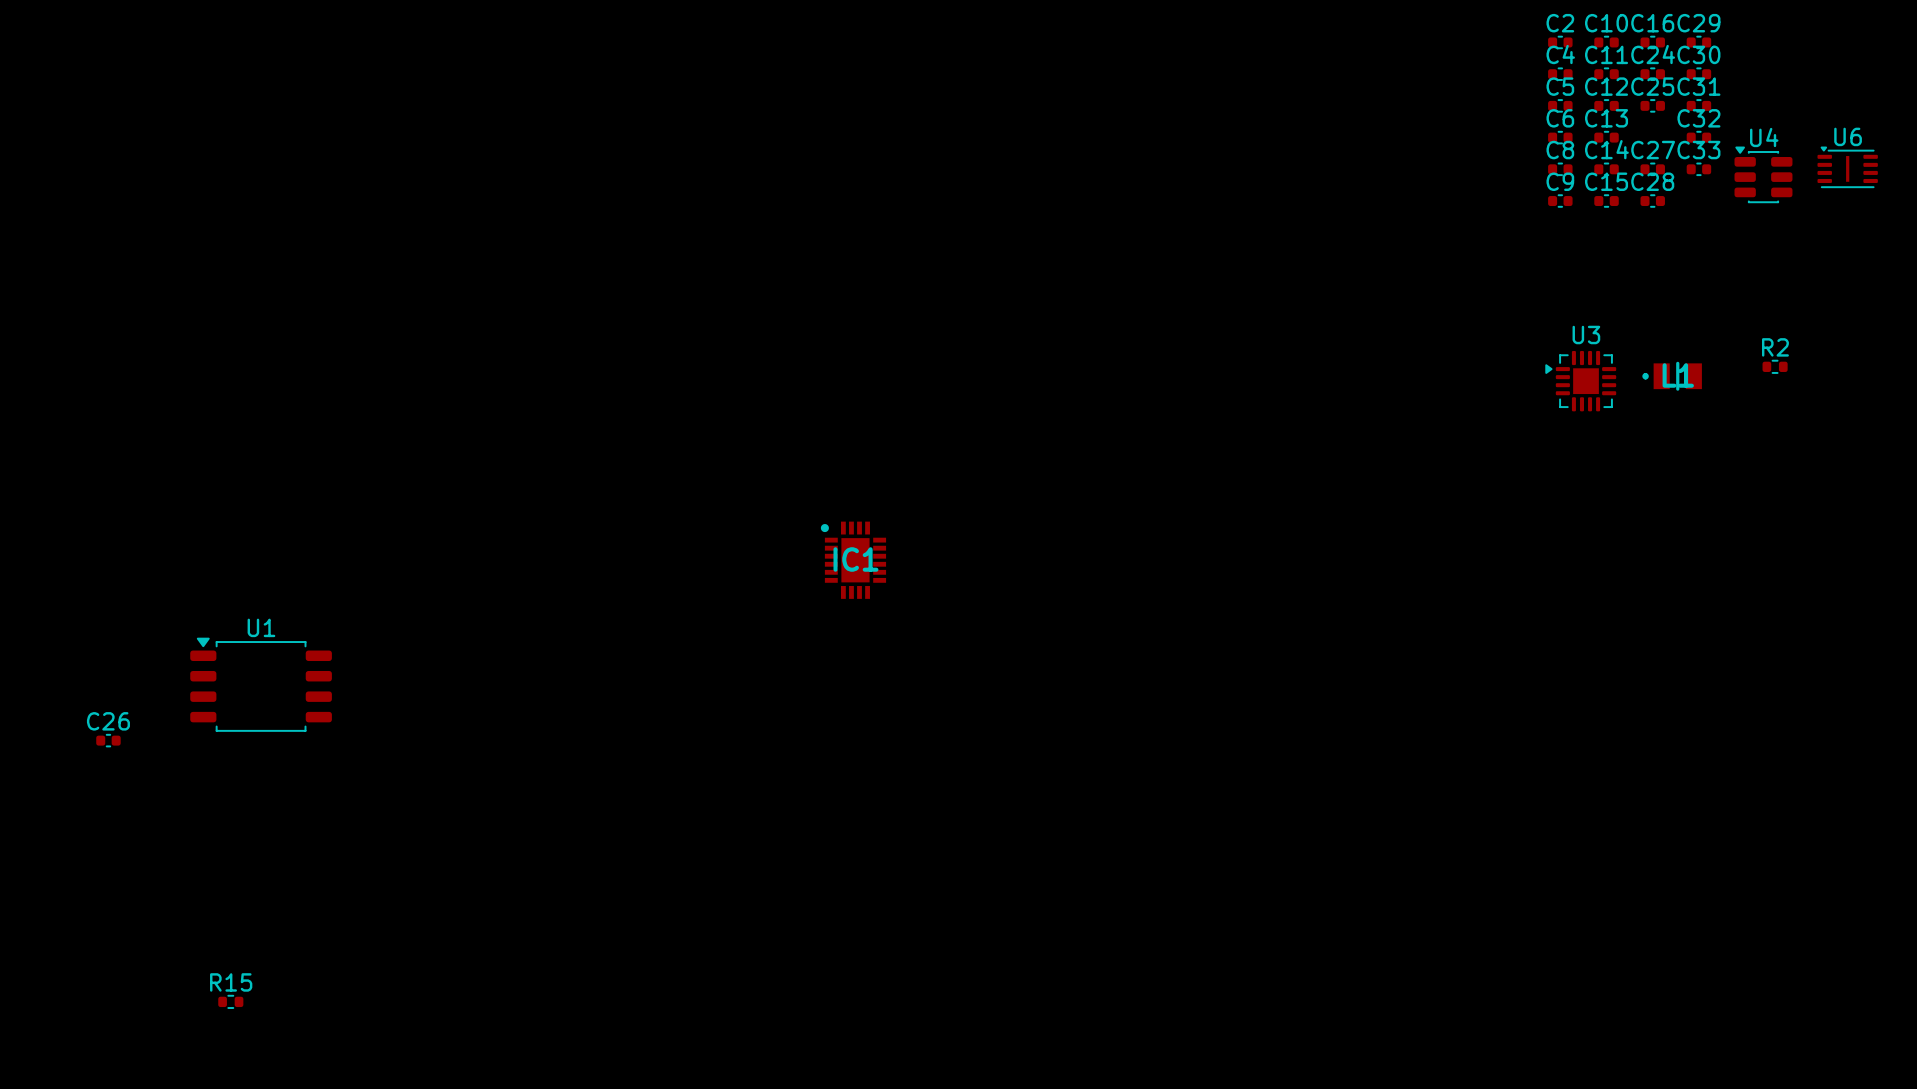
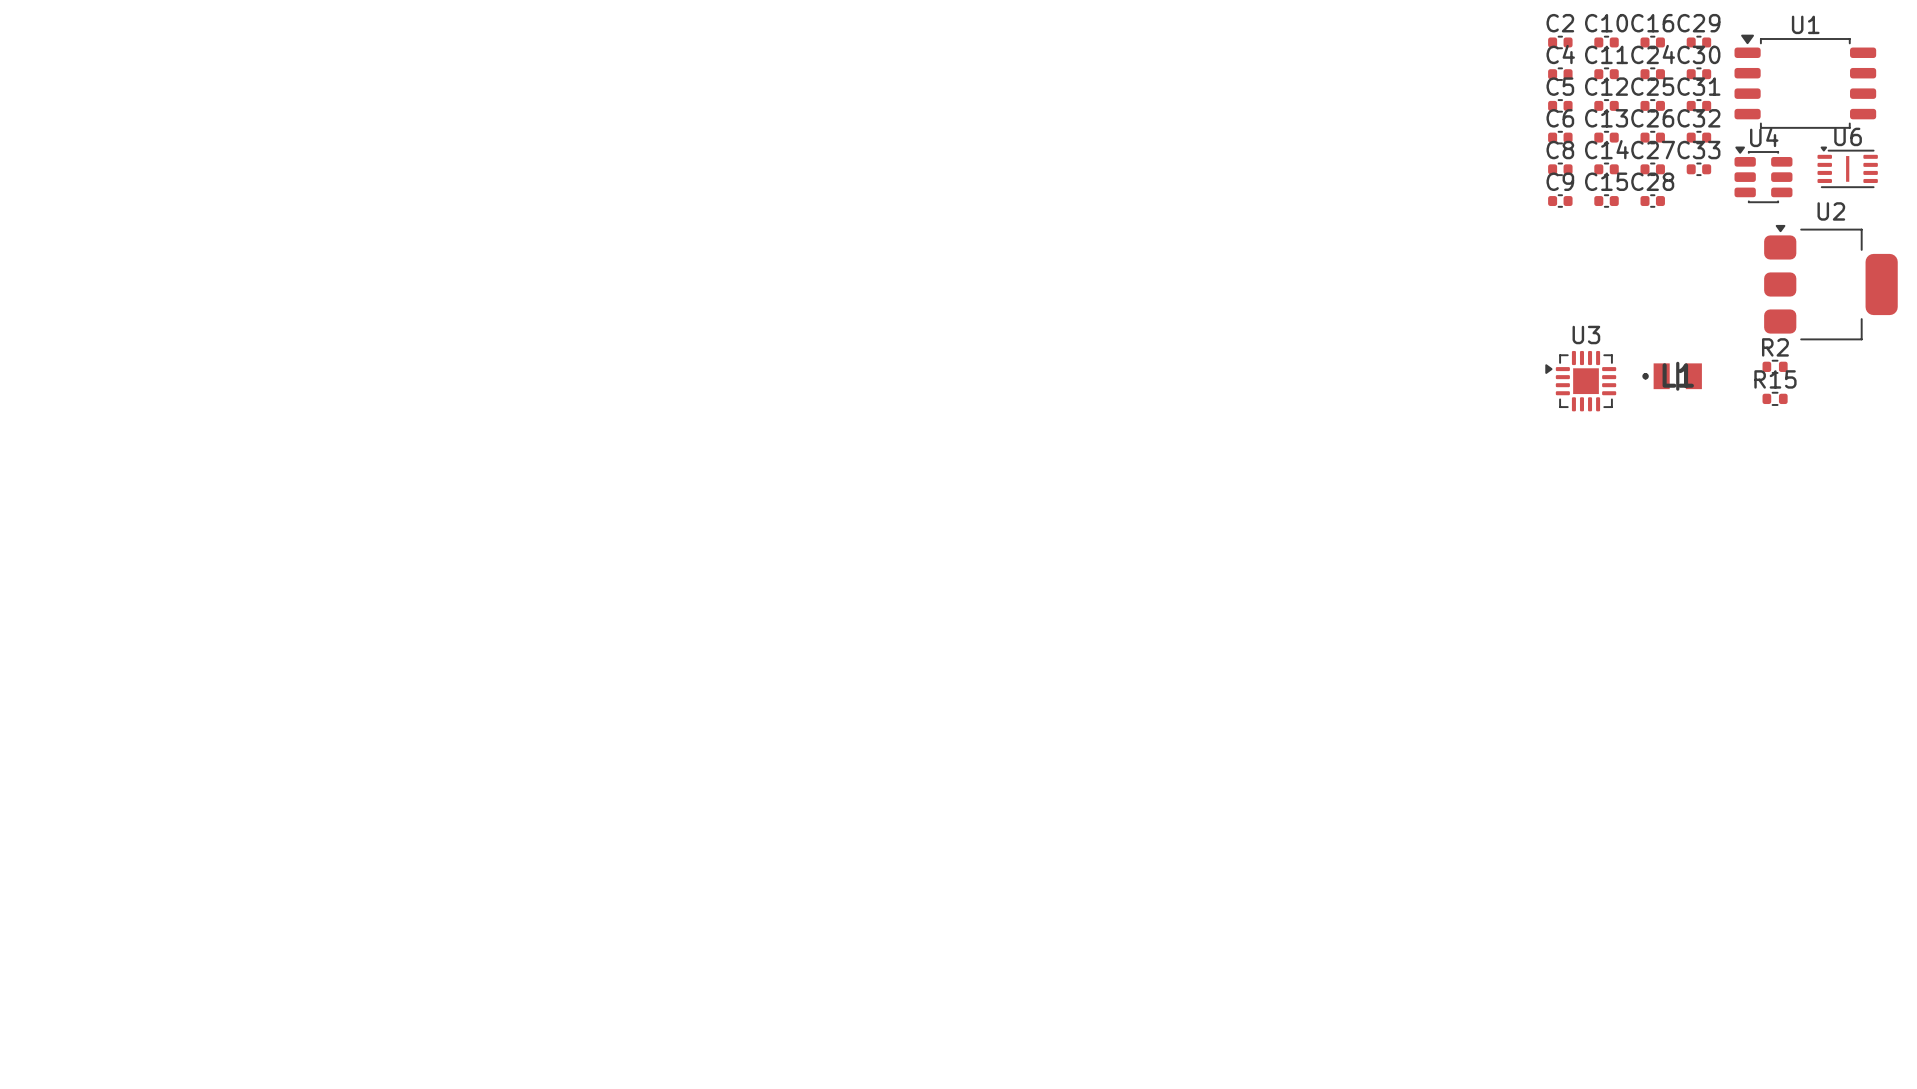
U2: none -> (1830, 282)
IC1: (853, 560) -> none
U1 position: (261, 684) -> (1805, 81)
C26 position: (108, 740) -> (1652, 137)
R15 position: (230, 1001) -> (1775, 398)

